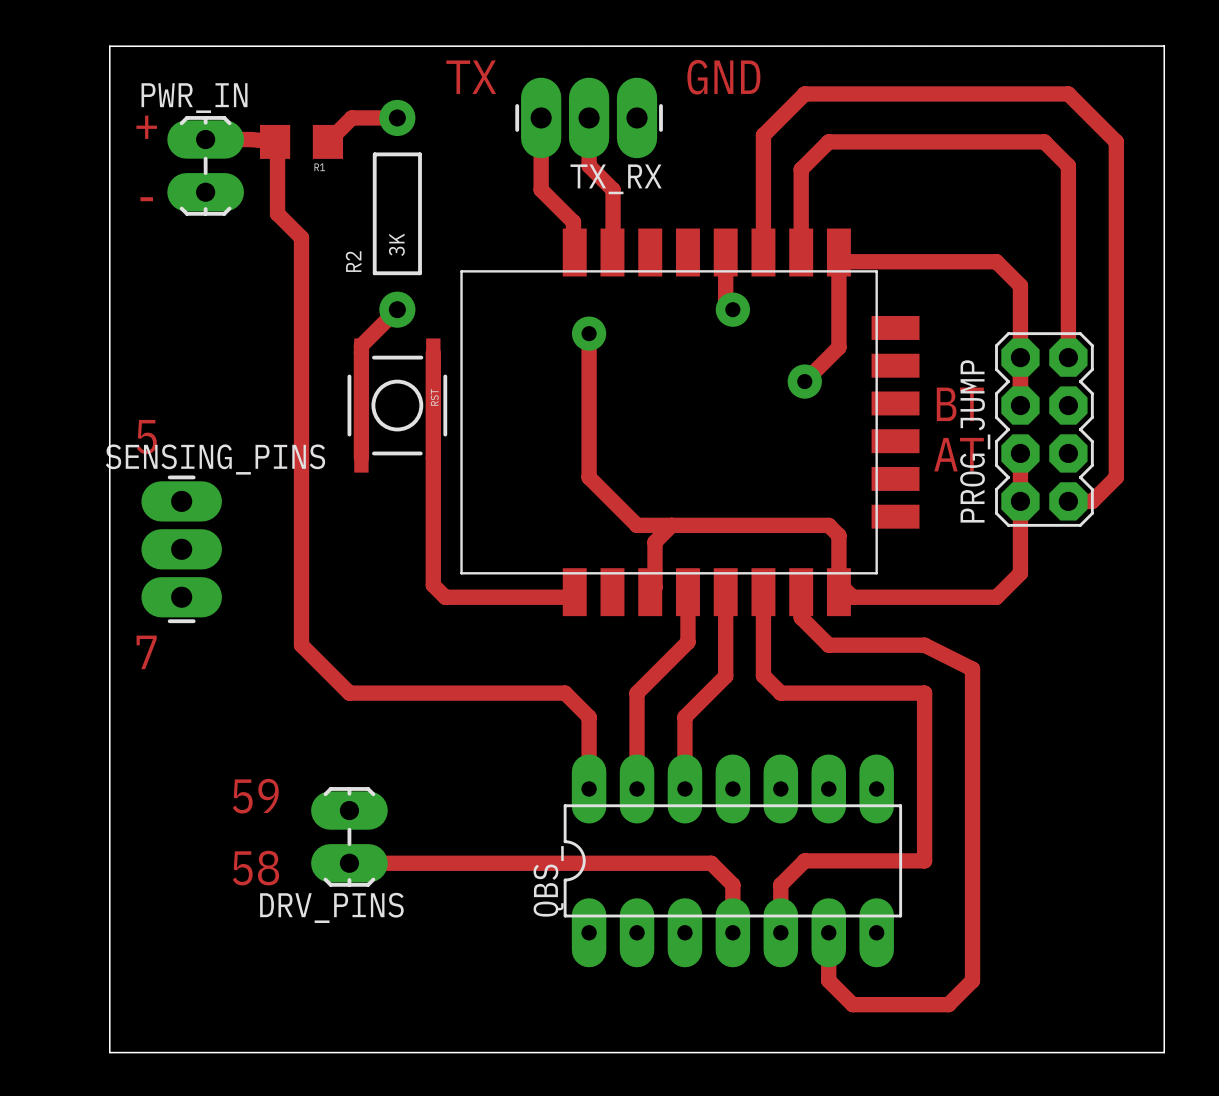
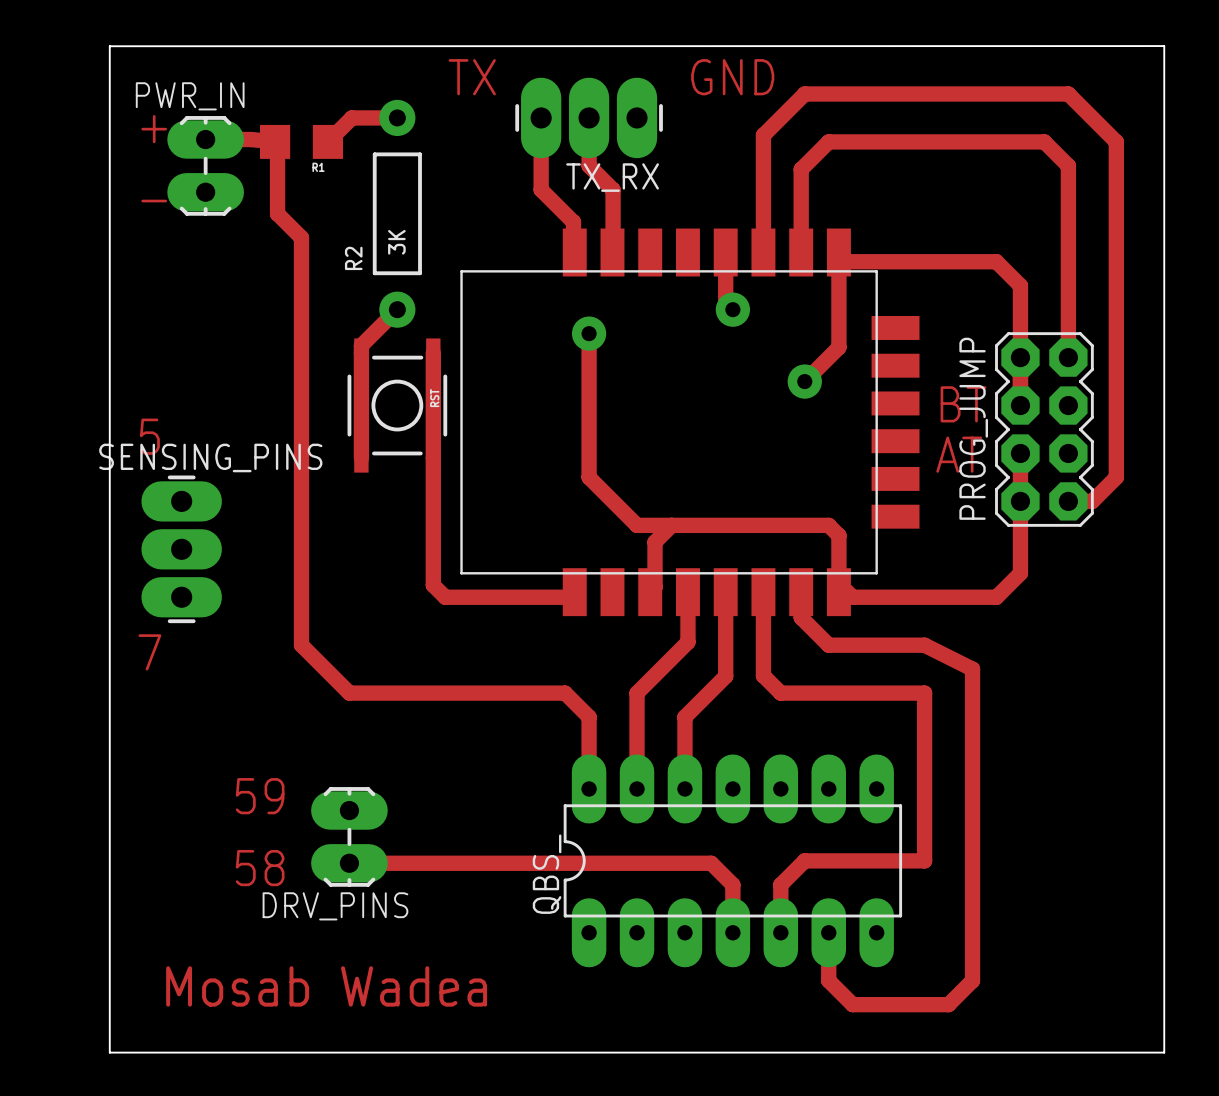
text: none -> Mosab Wadea (326, 986)

